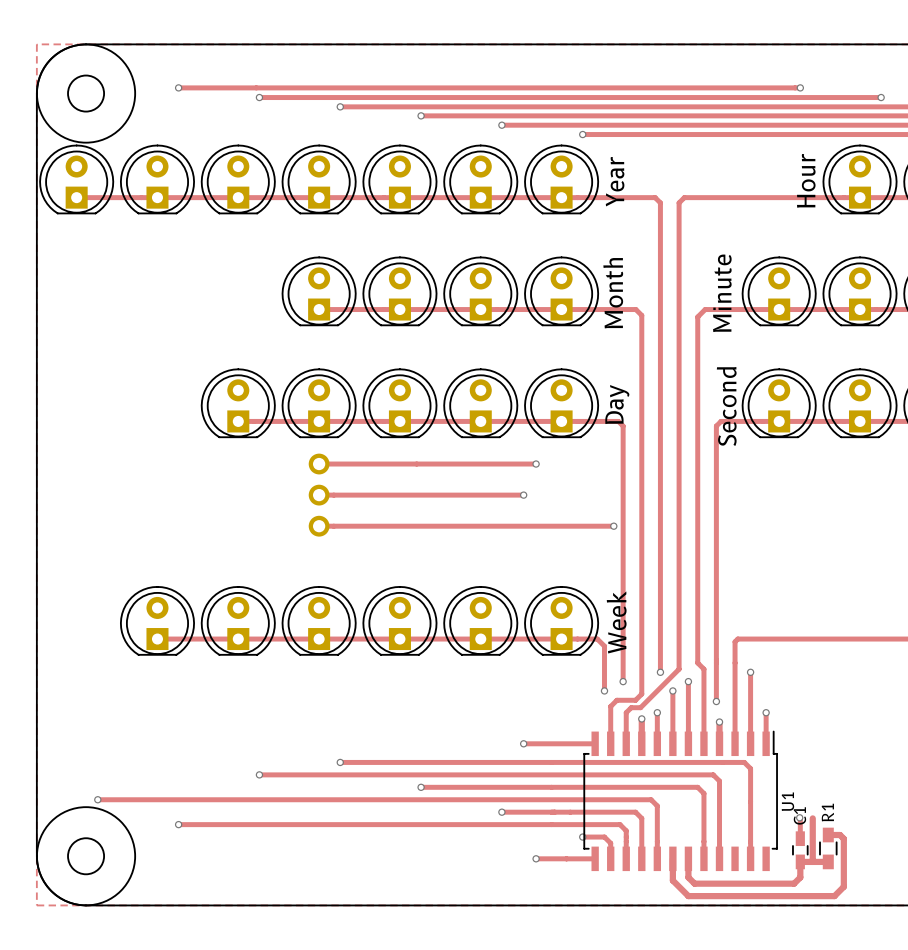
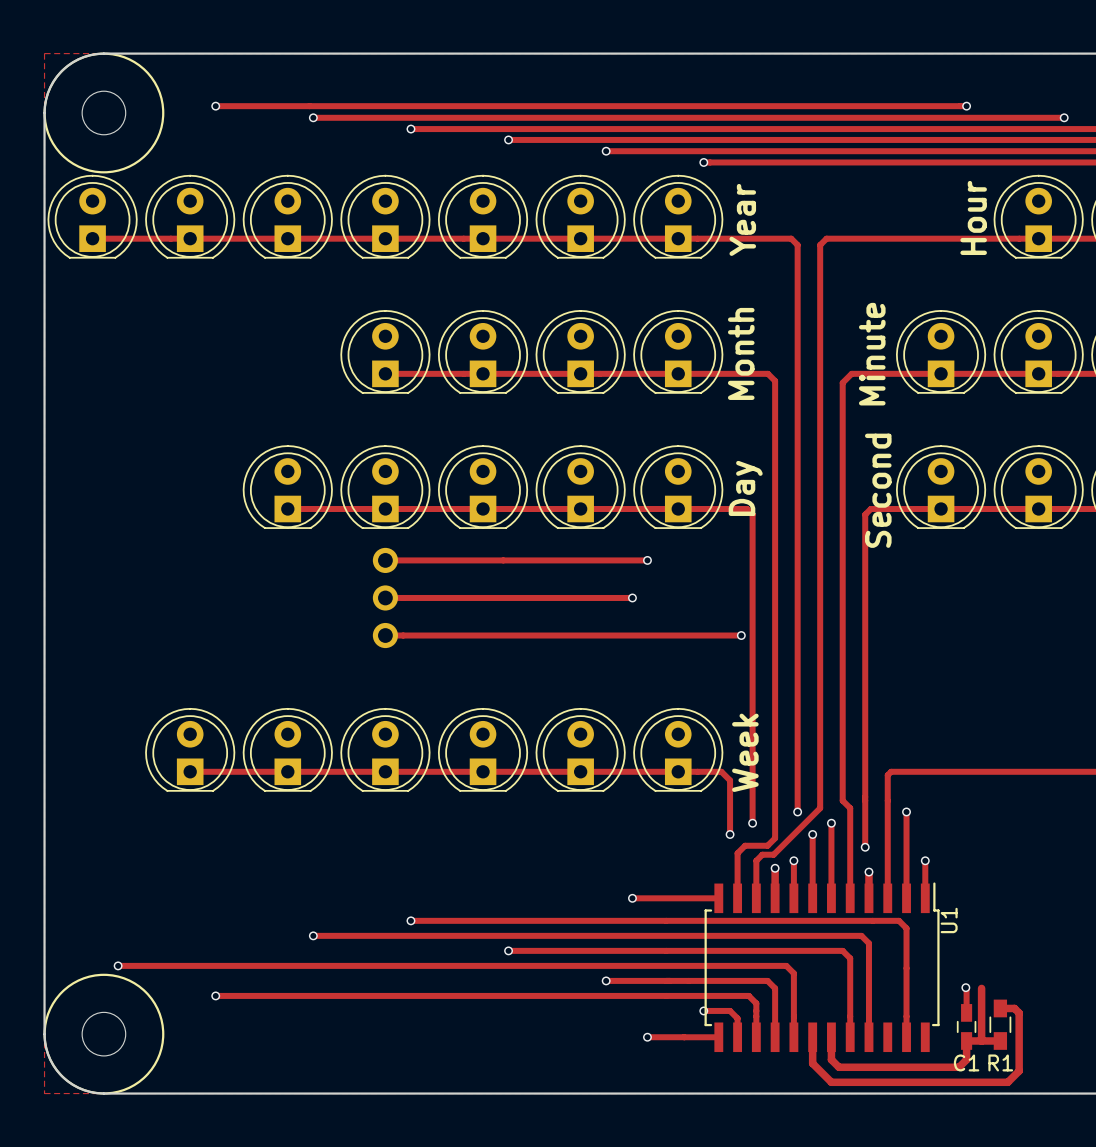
U1 name position: U1 (787, 801) -> U1 (949, 920)
R1 name rotation: 0° (827, 812) -> 90° clockwise (1000, 1062)
R1 name position: R1 (827, 812) -> R1 (1000, 1062)
C1 name rotation: 0° (799, 815) -> 90° clockwise (966, 1062)
C1 name position: C1 (799, 815) -> C1 (966, 1062)

